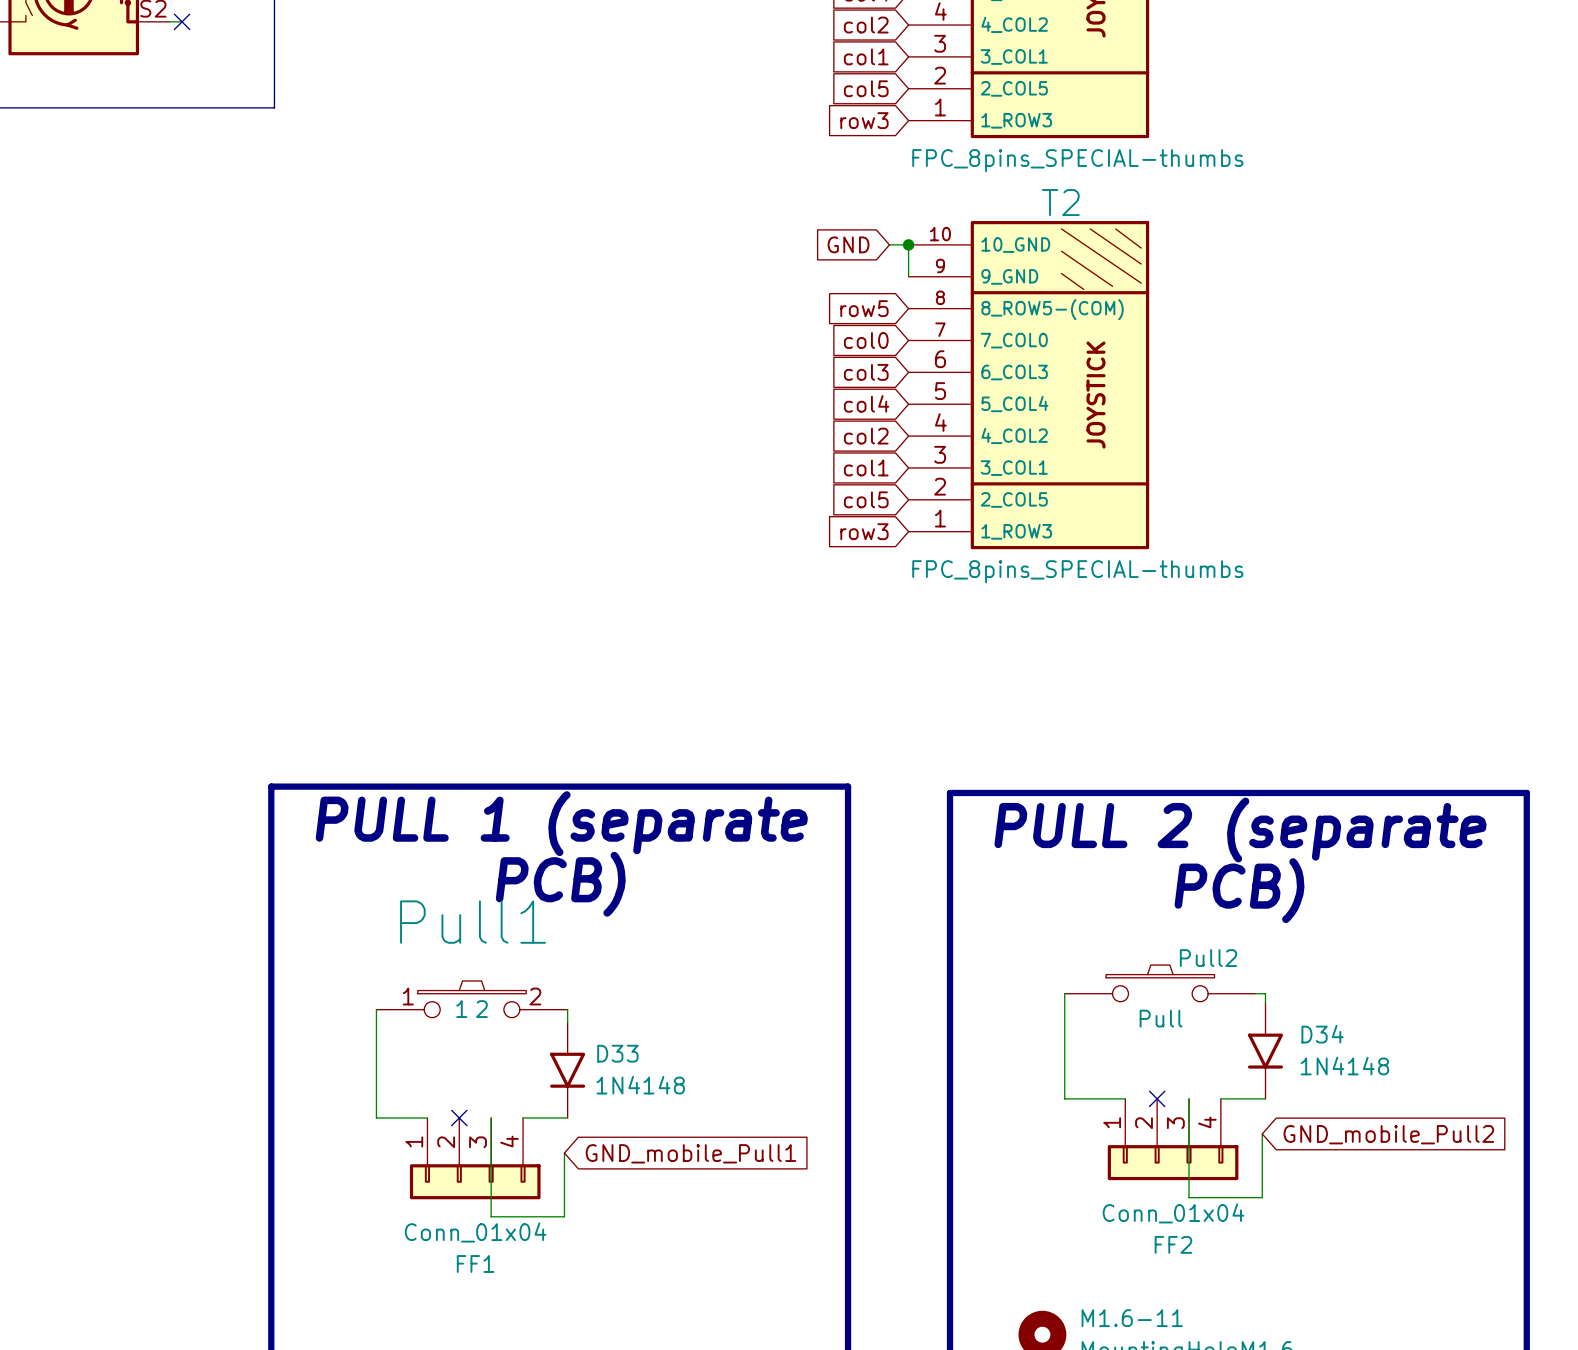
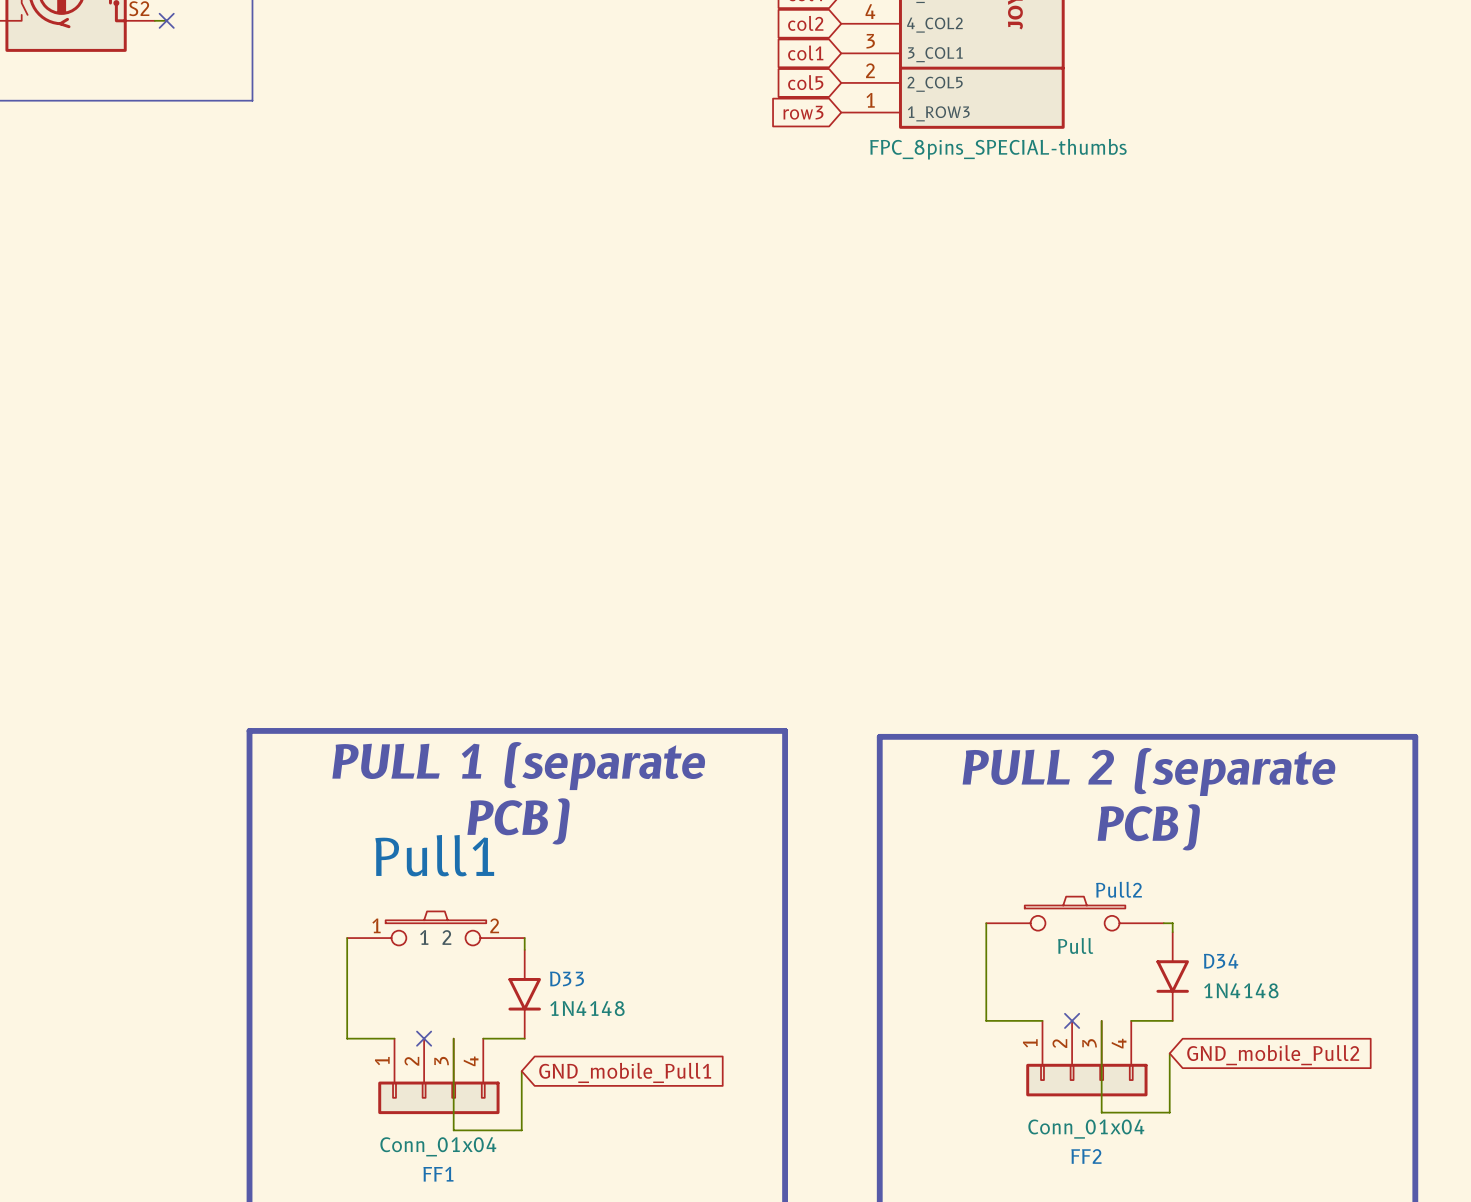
global label: GND (848, 244) -> none
wire: (889, 244) (908, 244) (908, 276) -> none
junction: (908, 244) -> none
global label: row5 (864, 308) -> none
global label: col0 (866, 340) -> none
global label: col3 (866, 372) -> none
T2: FPC_8pins_SPECIAL-thumbs (1028, 385) -> none
global label: col4 (866, 403) -> none
global label: col2 (866, 436) -> none
global label: col1 (866, 467) -> none
global label: col5 (866, 499) -> none
global label: row3 (864, 531) -> none

